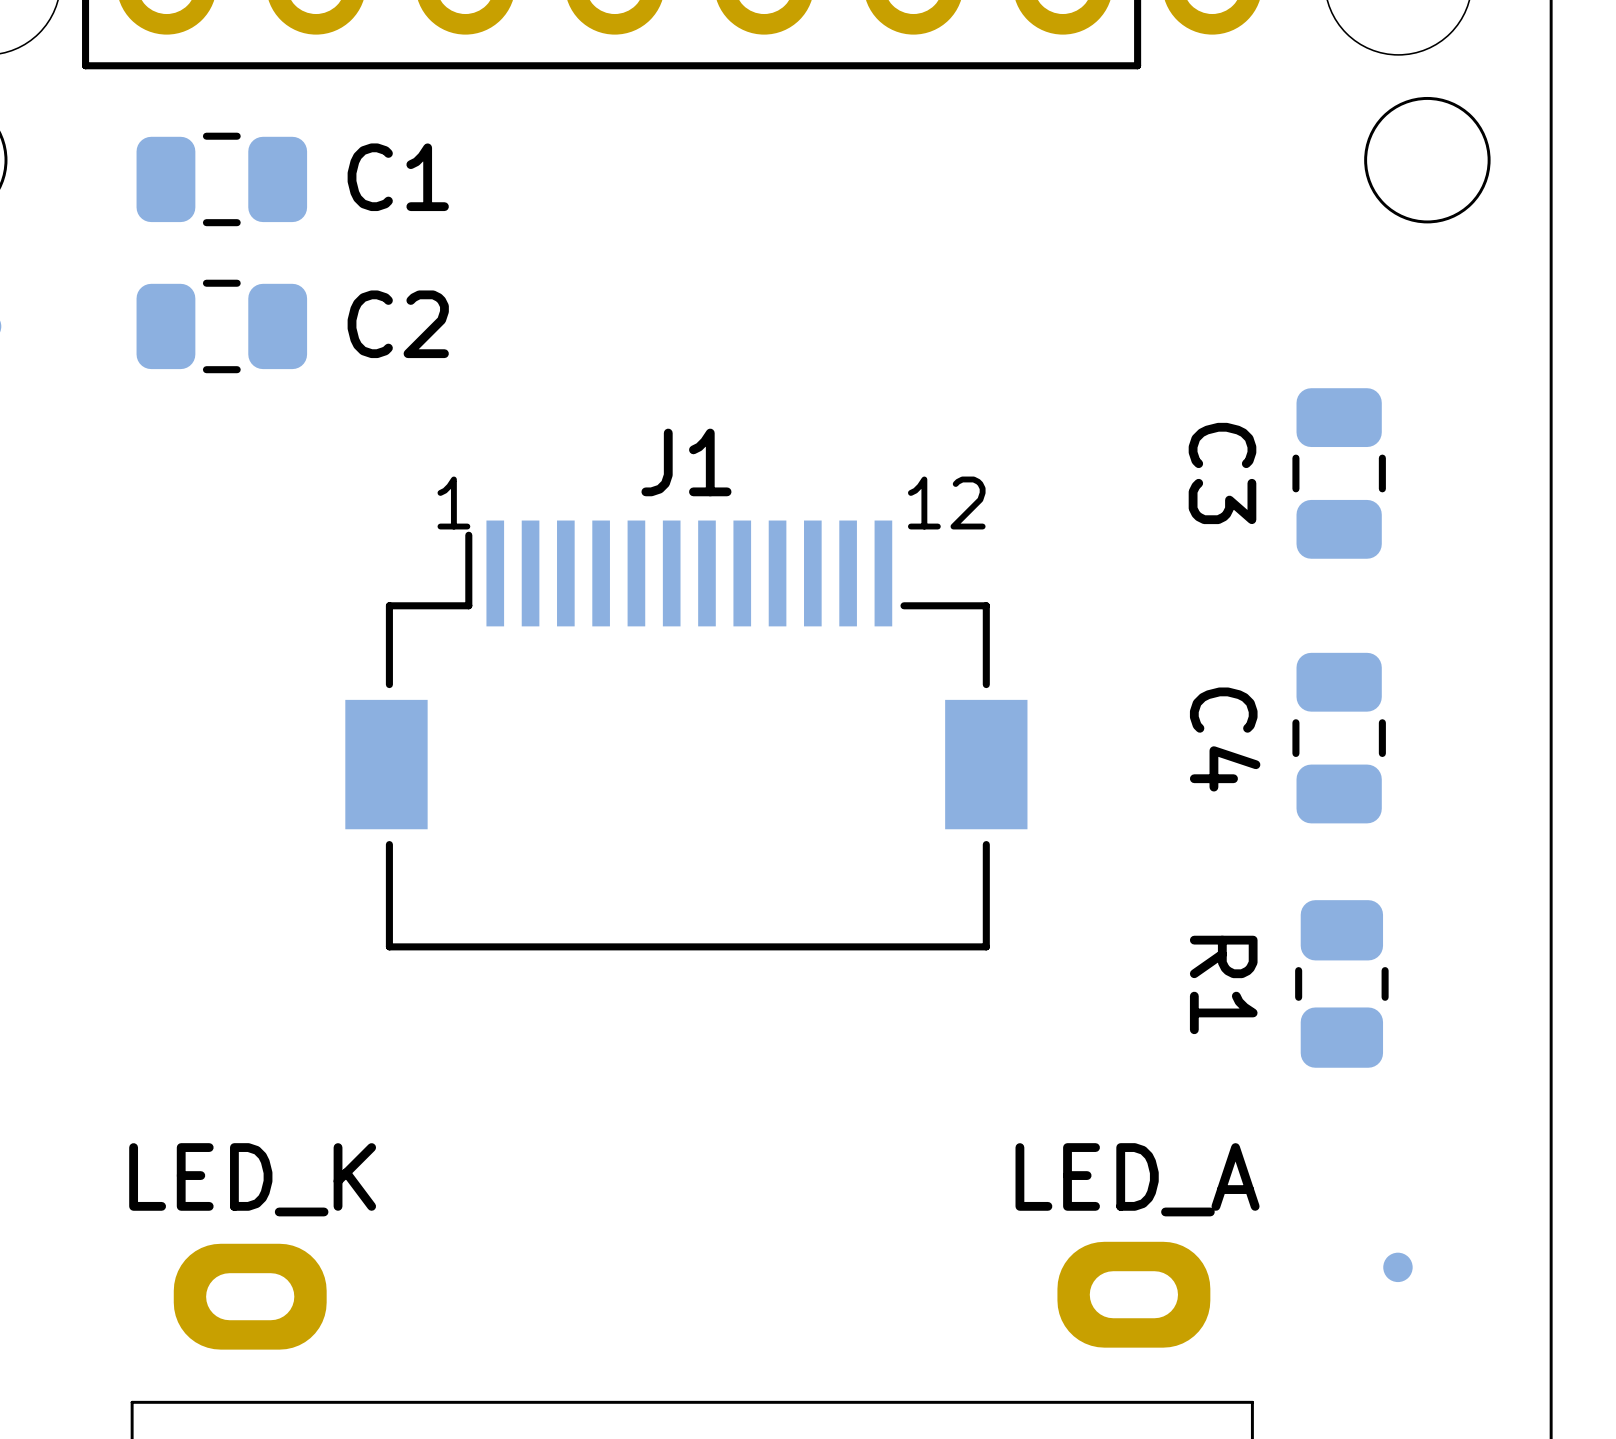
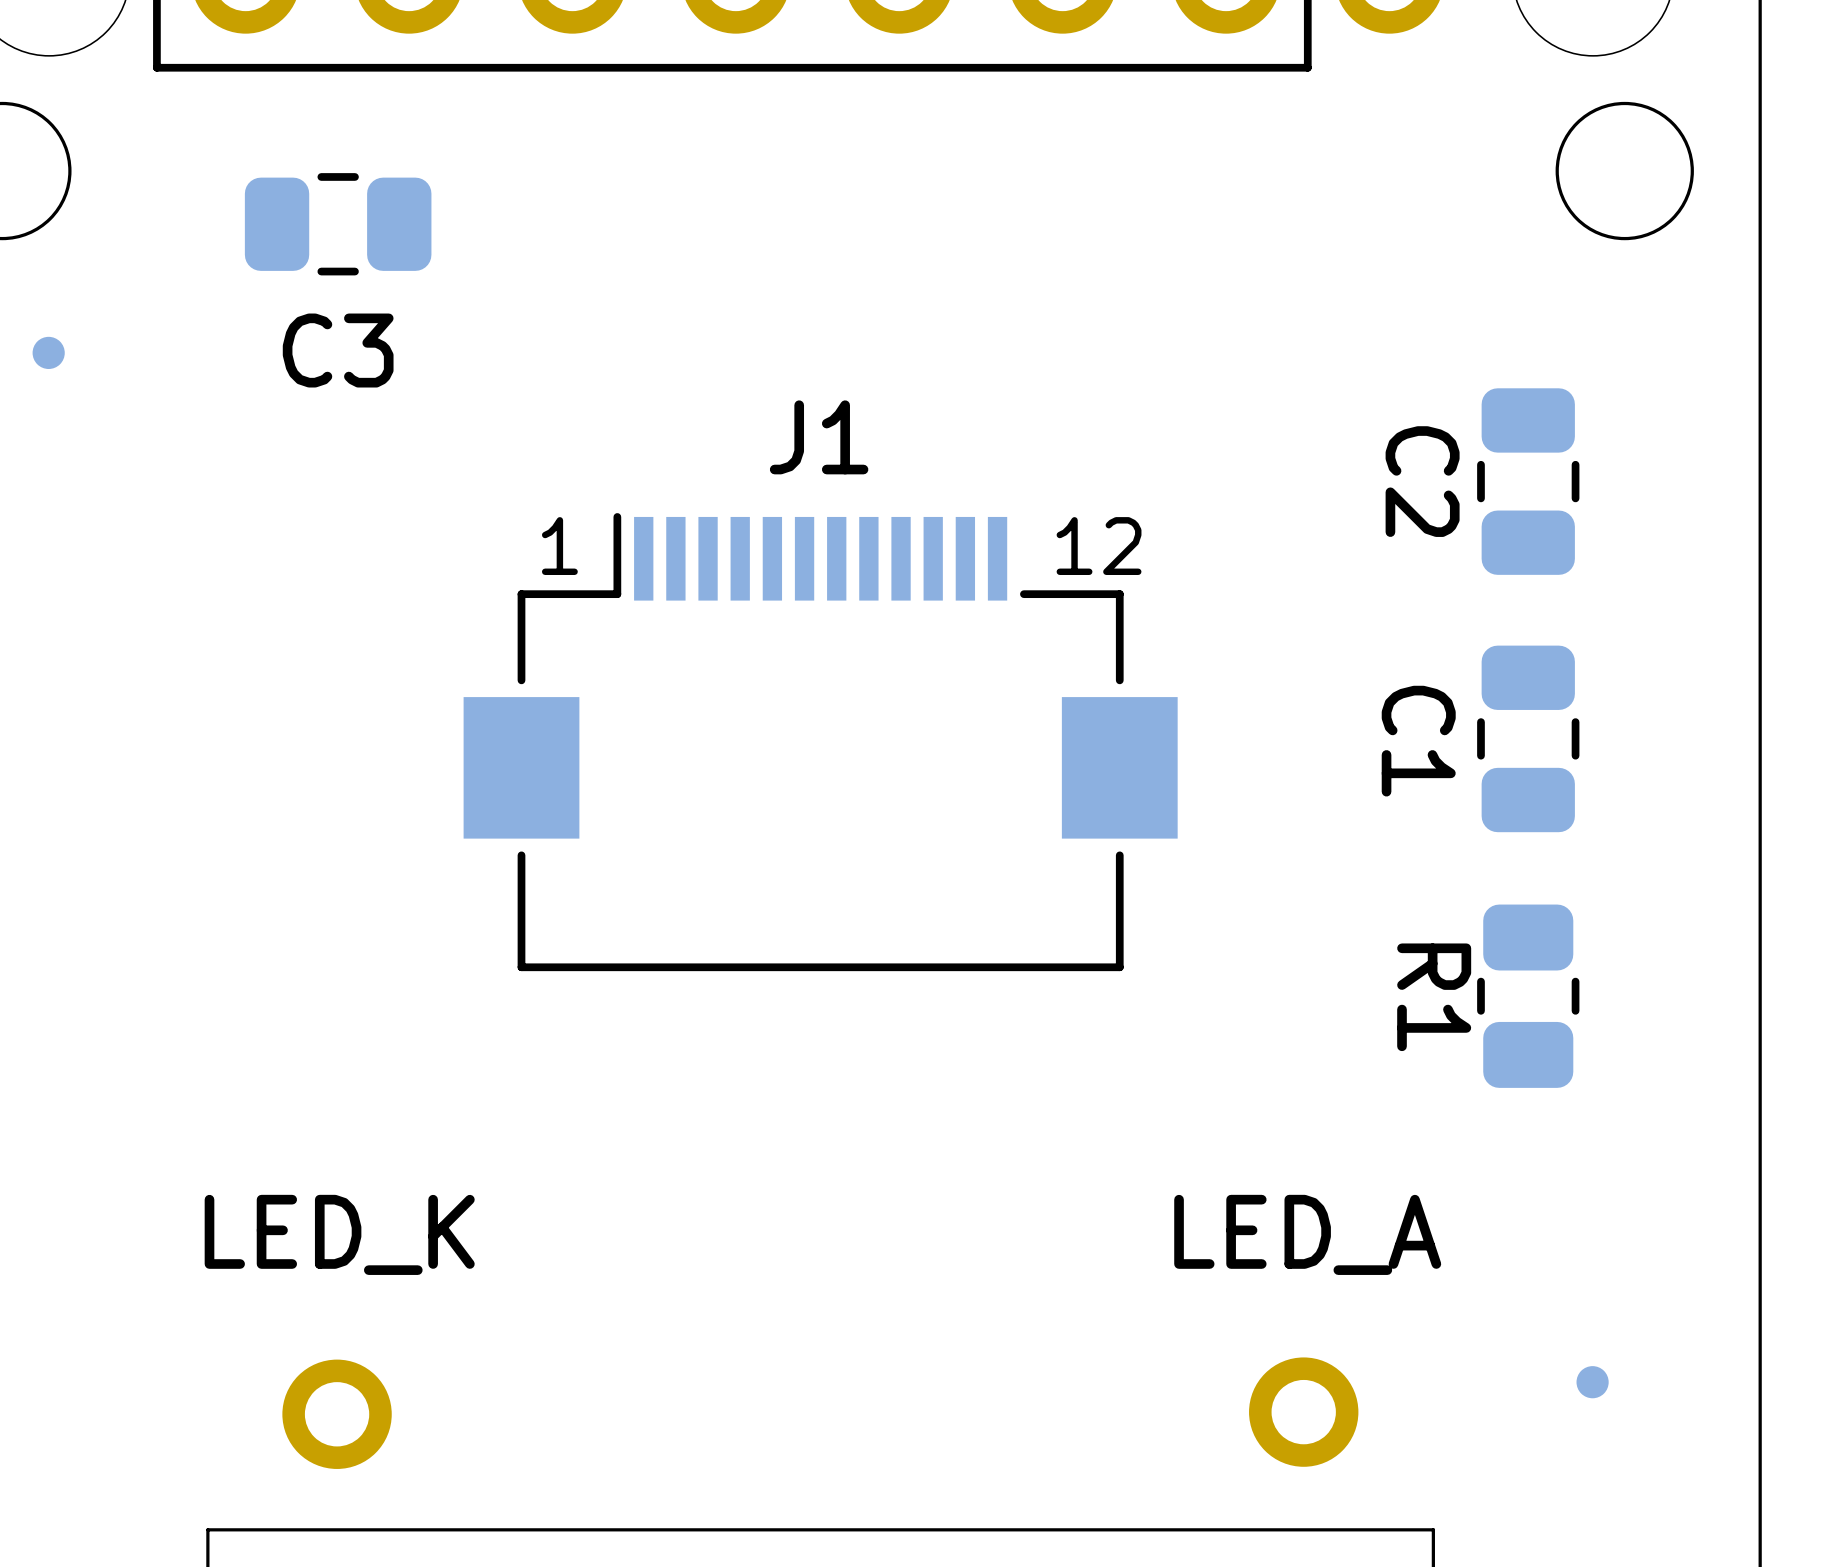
C1 name position: C1 (398, 177) -> C1 (1418, 741)
C1 rotation: 0° (221, 179) -> 90° clockwise (1528, 738)
C1 position: (221, 179) -> (1528, 738)
C2 name position: C2 (398, 324) -> C2 (1422, 481)
C2 rotation: 0° (221, 326) -> 90° clockwise (1528, 481)
C2 position: (221, 326) -> (1528, 481)
C3 name position: C3 (1222, 473) -> C3 (338, 350)
C3 rotation: 0° (1339, 473) -> 90° clockwise (338, 224)
C3 position: (1339, 473) -> (338, 224)
J1 footprint: [345, 520, 1028, 951] -> [463, 513, 1178, 972]
C4: (1339, 738) -> none
R1 position: (1341, 983) -> (1528, 996)
R1 name position: R1 (1223, 984) -> R1 (1434, 997)
text position: LED_K (252, 1179) -> LED_K (339, 1234)
text position: LED_A (1137, 1179) -> LED_A (1307, 1234)
part footprint: [1057, 1241, 1211, 1348] -> [1249, 1357, 1359, 1467]
part footprint: [173, 1243, 327, 1350] -> [282, 1359, 392, 1469]

